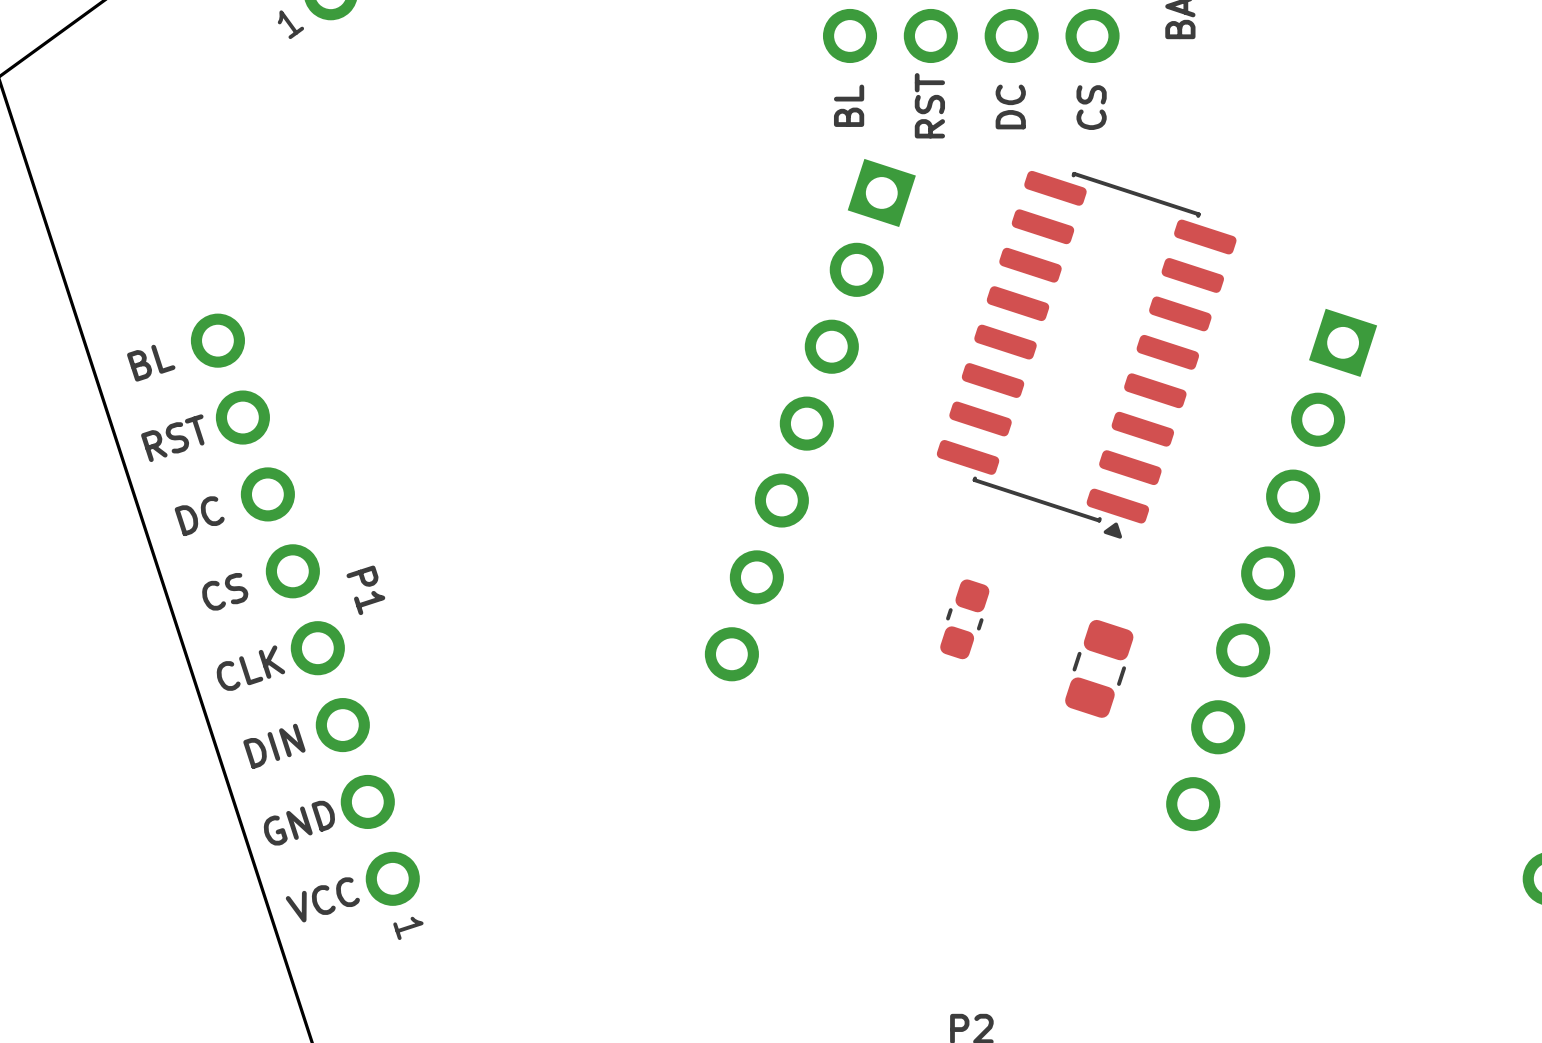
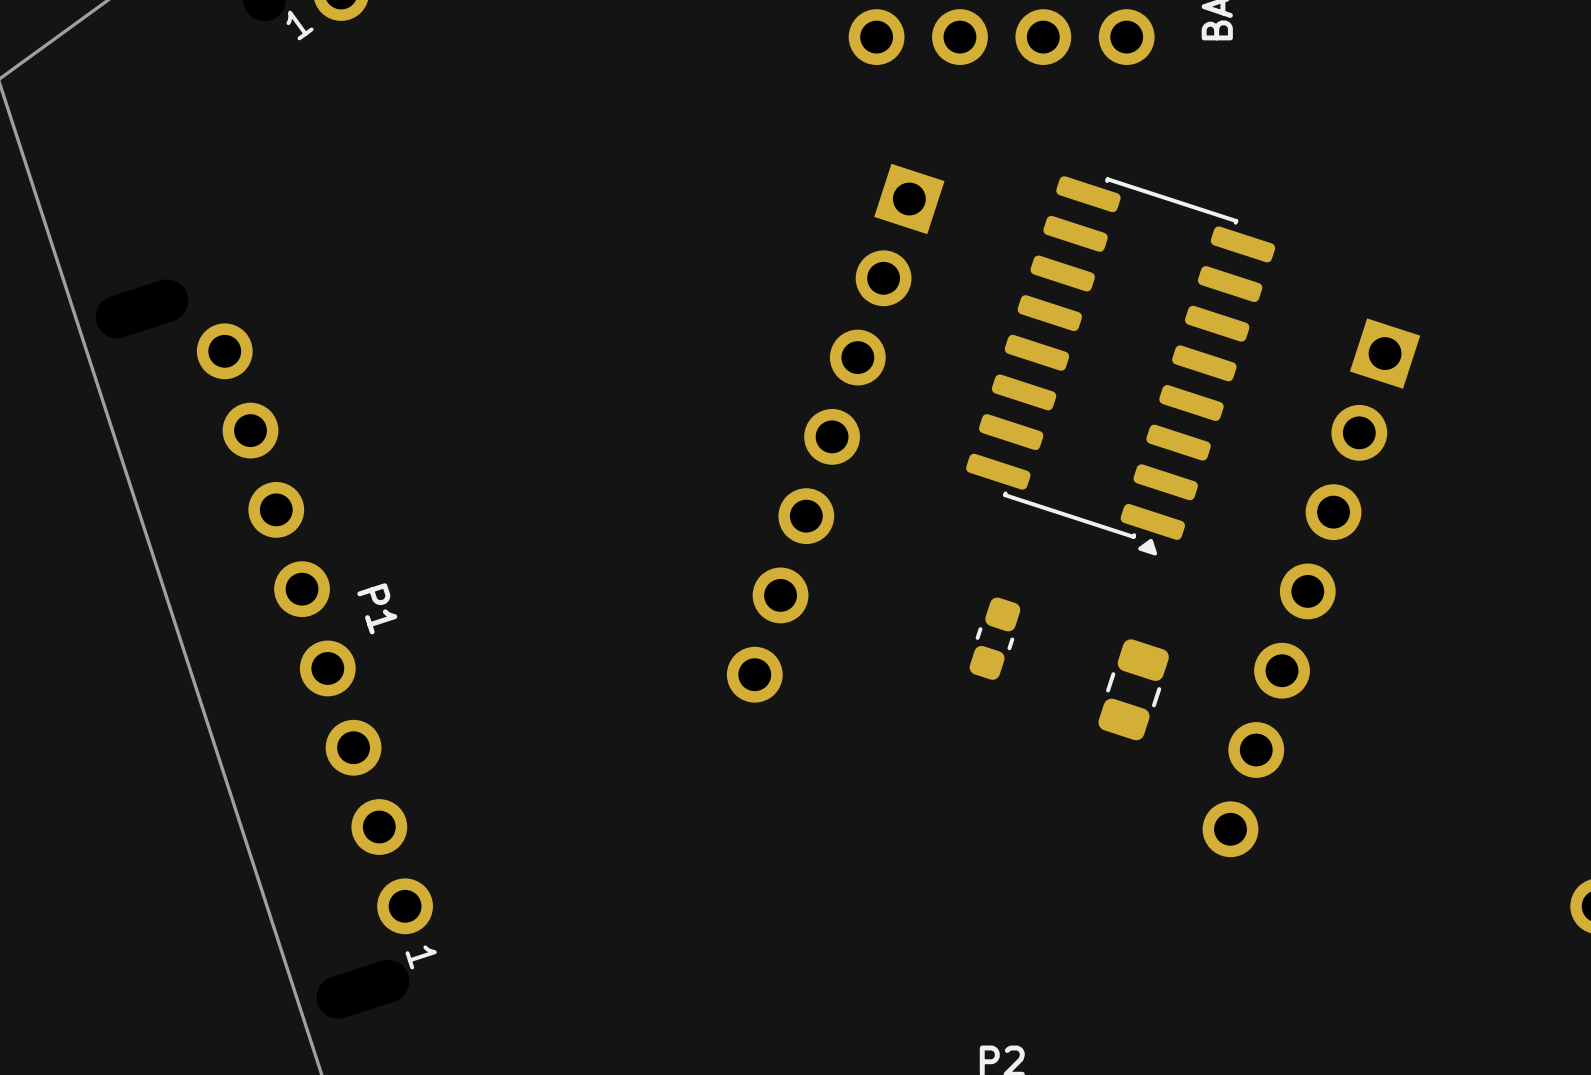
text: BL (849, 105) -> none
text: RST (929, 105) -> none
text: DC (1010, 106) -> none
text: CS (1091, 107) -> none
text: BL (151, 363) -> none
text: RST (172, 438) -> none
text: DC (199, 516) -> none
text: CS (225, 591) -> none
text: CLK (250, 668) -> none
text: DIN (274, 746) -> none
text: GND (299, 823) -> none
text: VCC (322, 899) -> none

